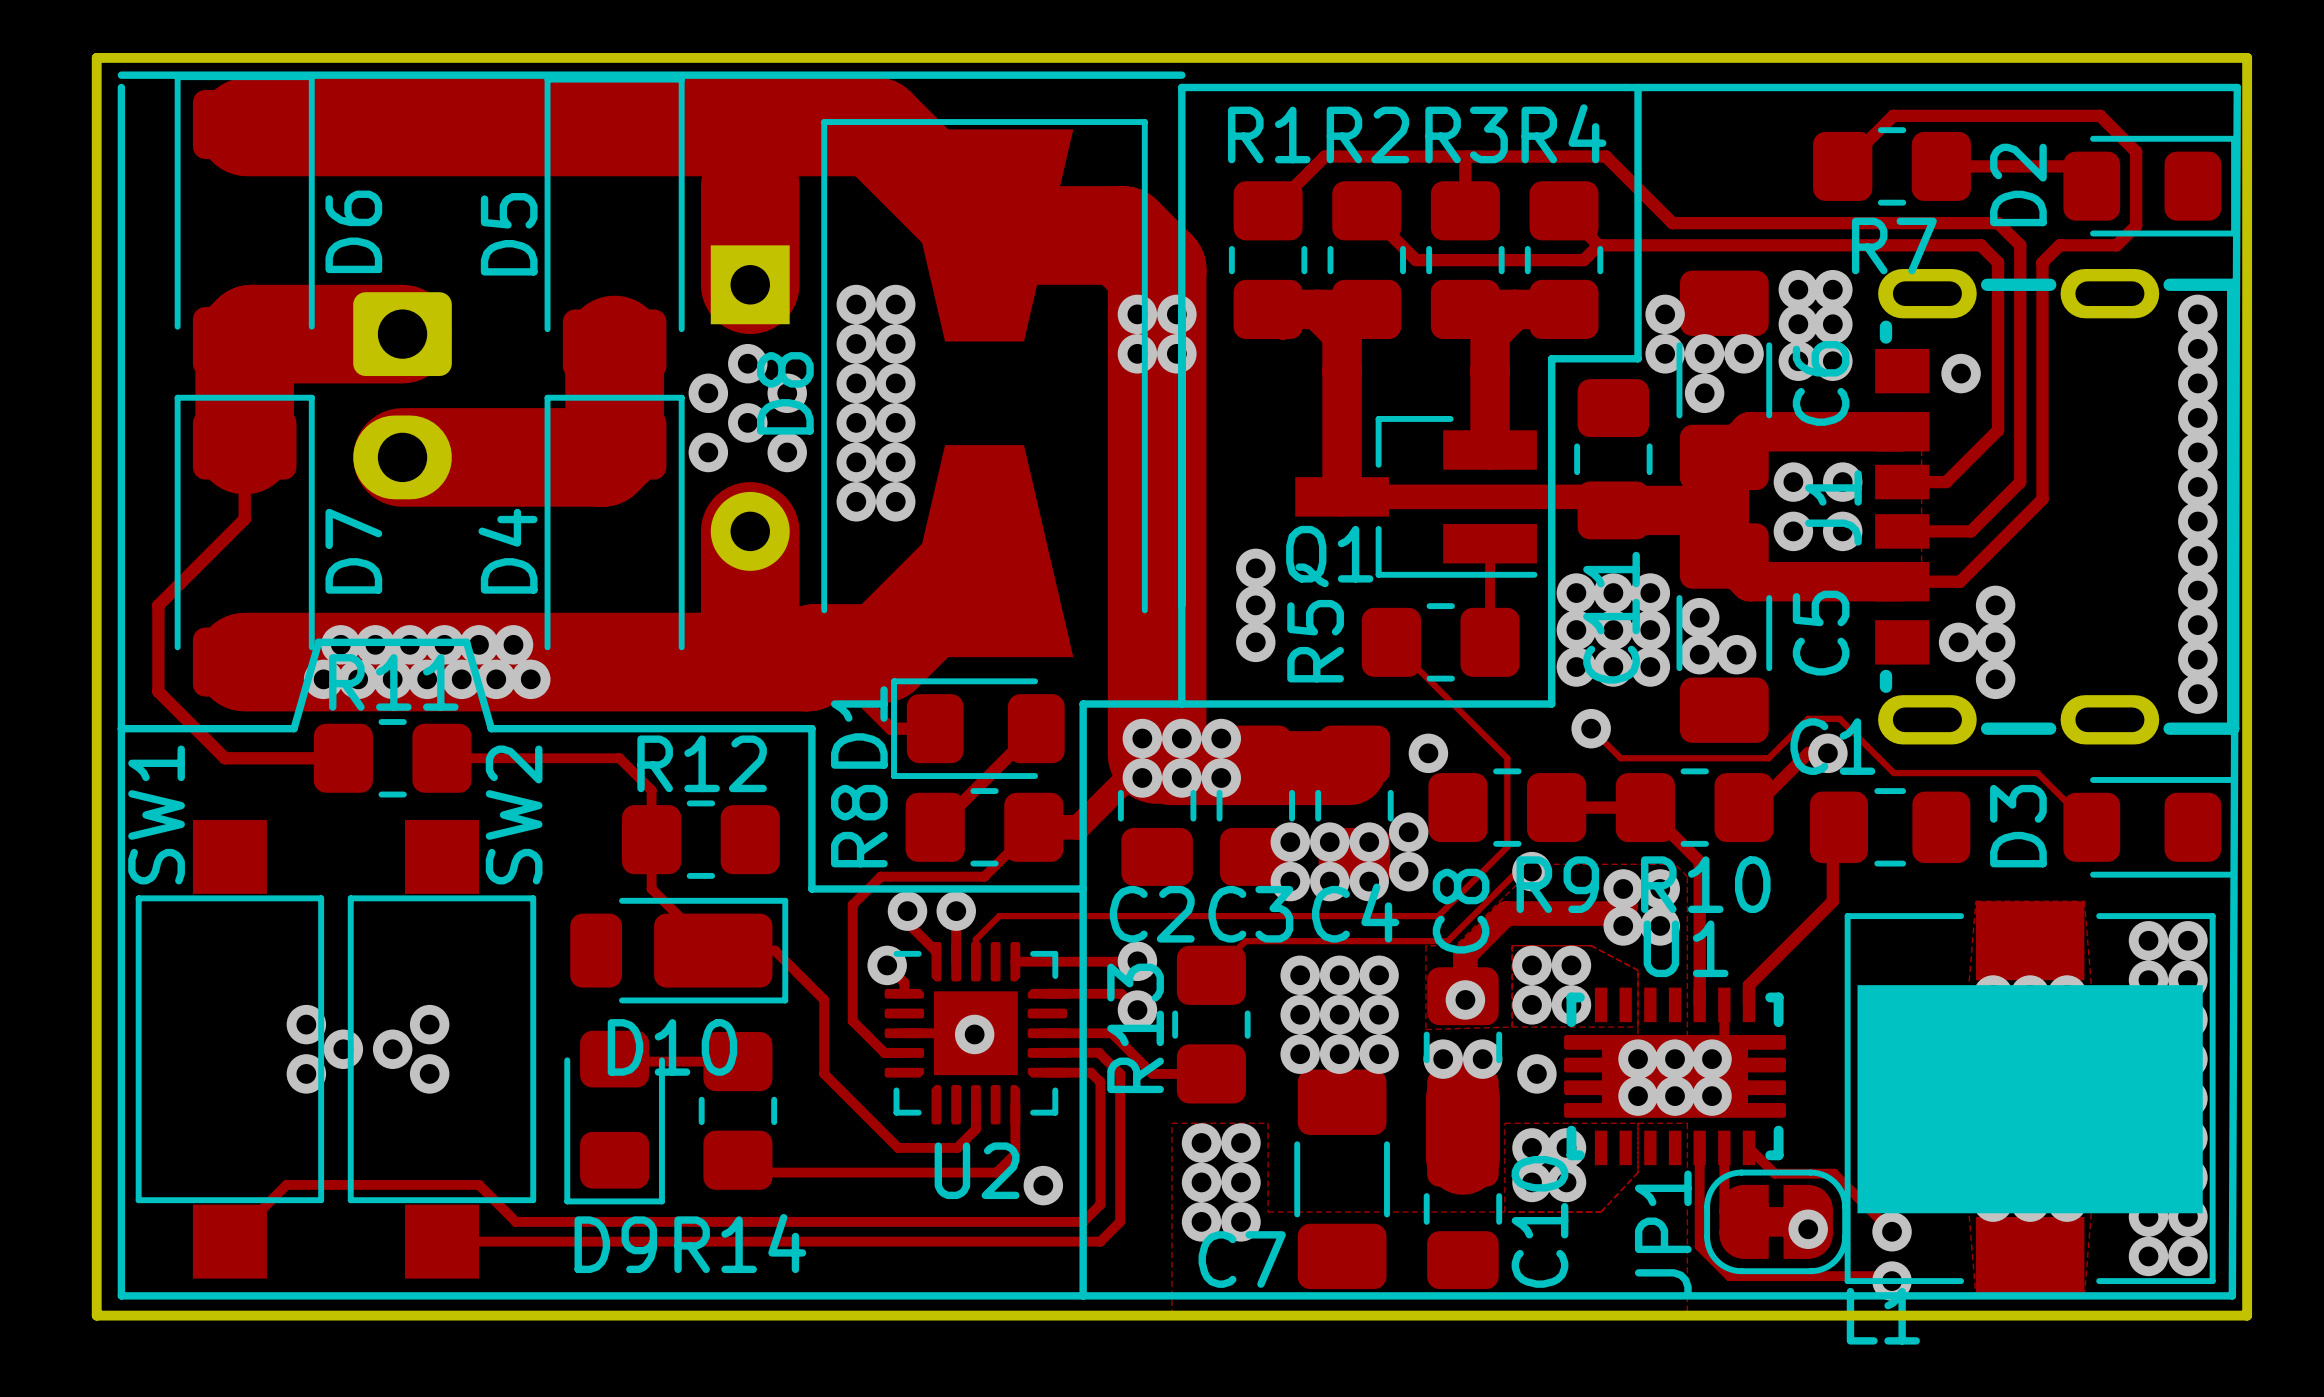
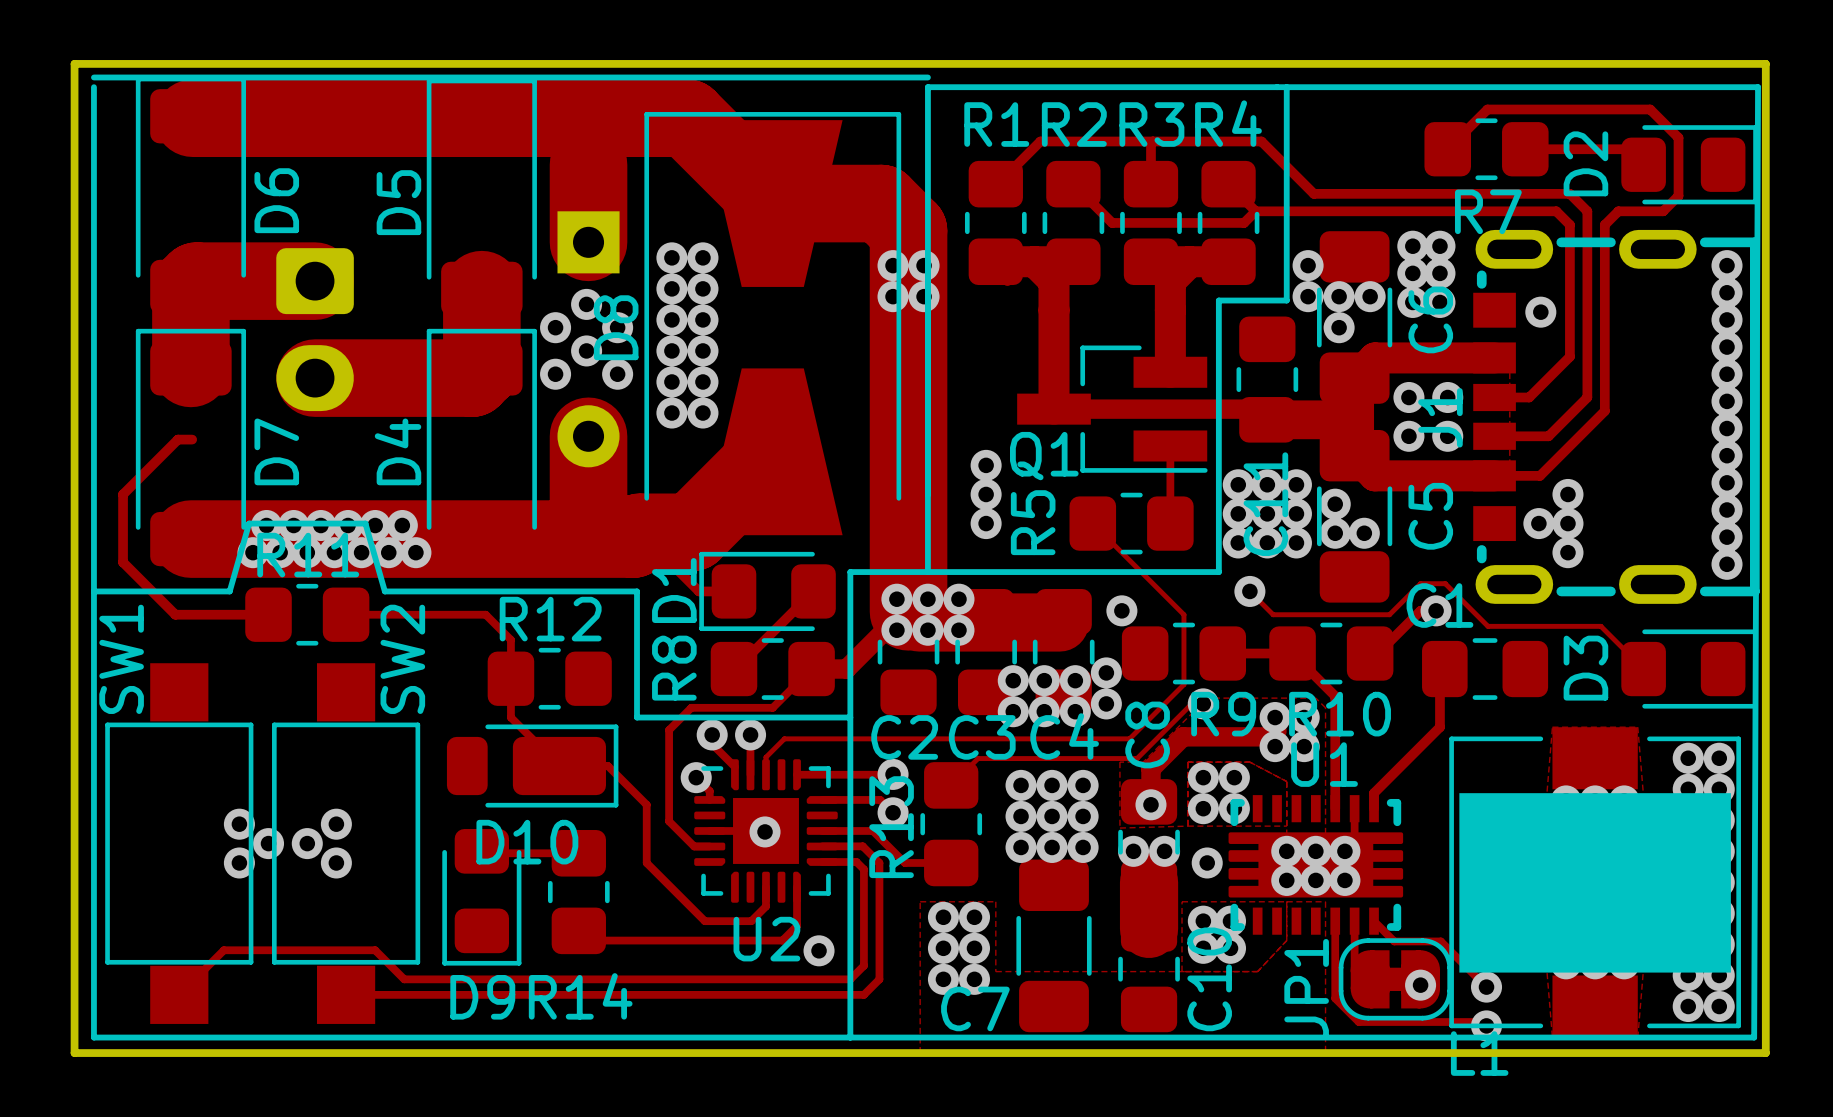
track: (244, 445) (244, 519) (228, 535) -> (192, 439) (177, 439)

